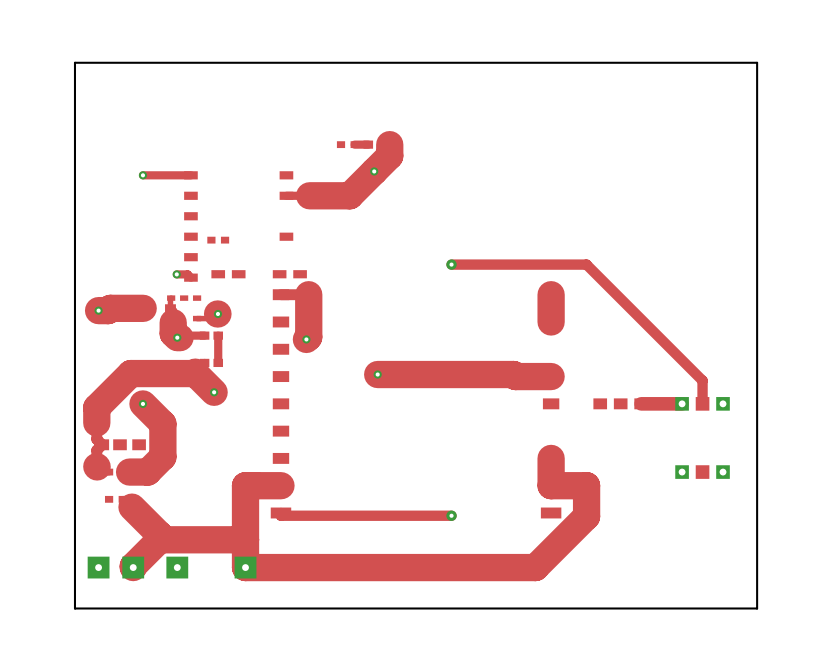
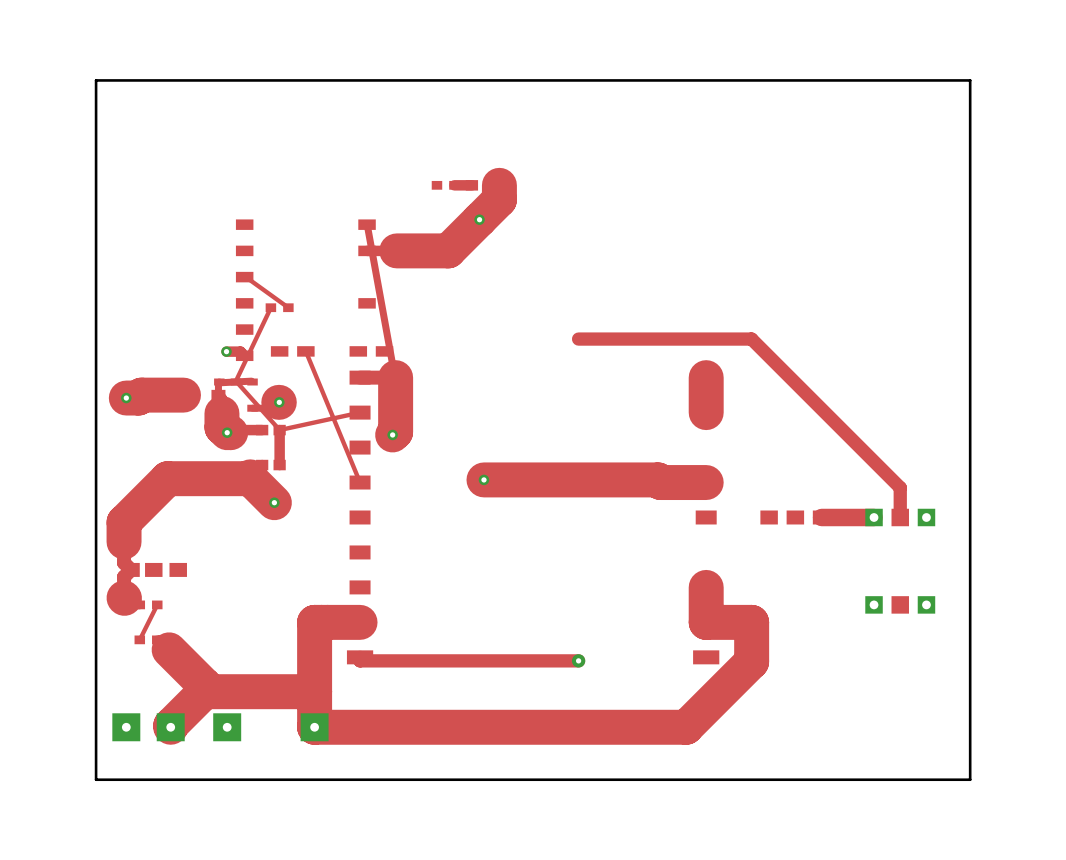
track: none -> (367, 223) (395, 377)
track: (142, 175) (190, 175) -> none
via: (142, 175) -> none
track: none -> (244, 276) (288, 307)
track: none -> (270, 307) (235, 381) (279, 430) (360, 412)
via: (451, 264) -> none
track: none -> (305, 351) (360, 482)
track: none -> (251, 381) (218, 382)
track: (142, 403) (162, 423) (162, 456) (147, 472) (122, 472) -> (139, 639) (157, 604)
via: (142, 403) -> none

